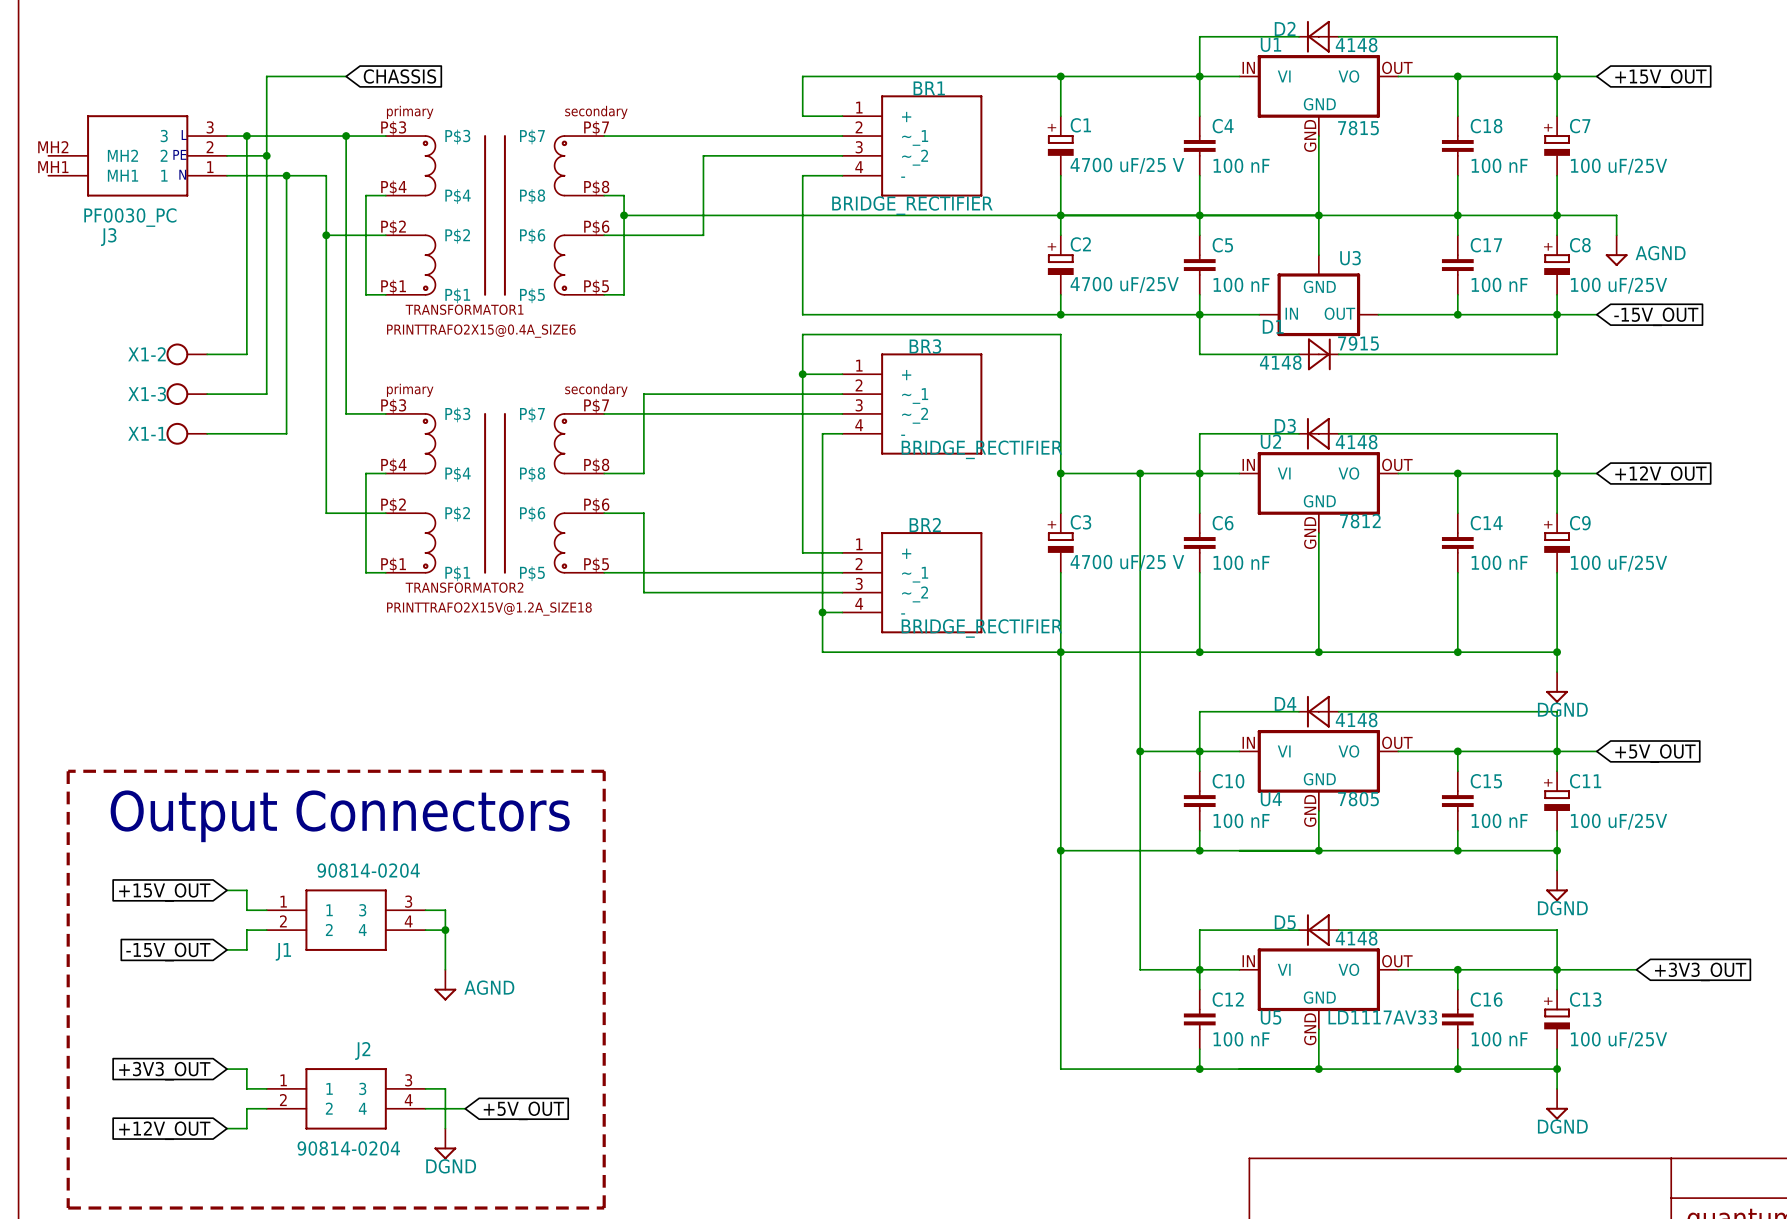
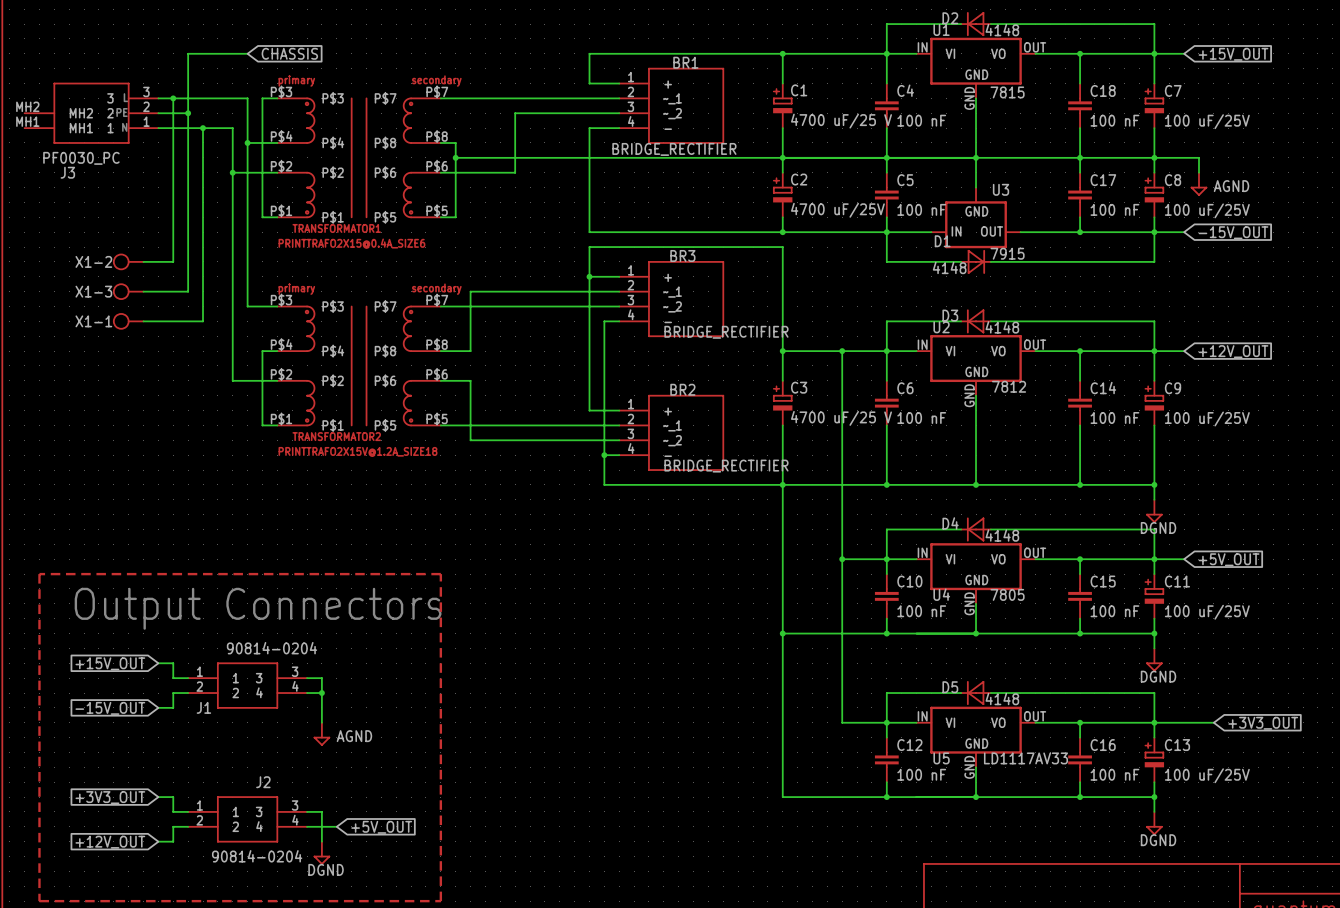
wire: (346, 136) (365, 136) -> (247, 142) (262, 142) (262, 98)
junction: (346, 136) -> none
junction: none -> (247, 142)

